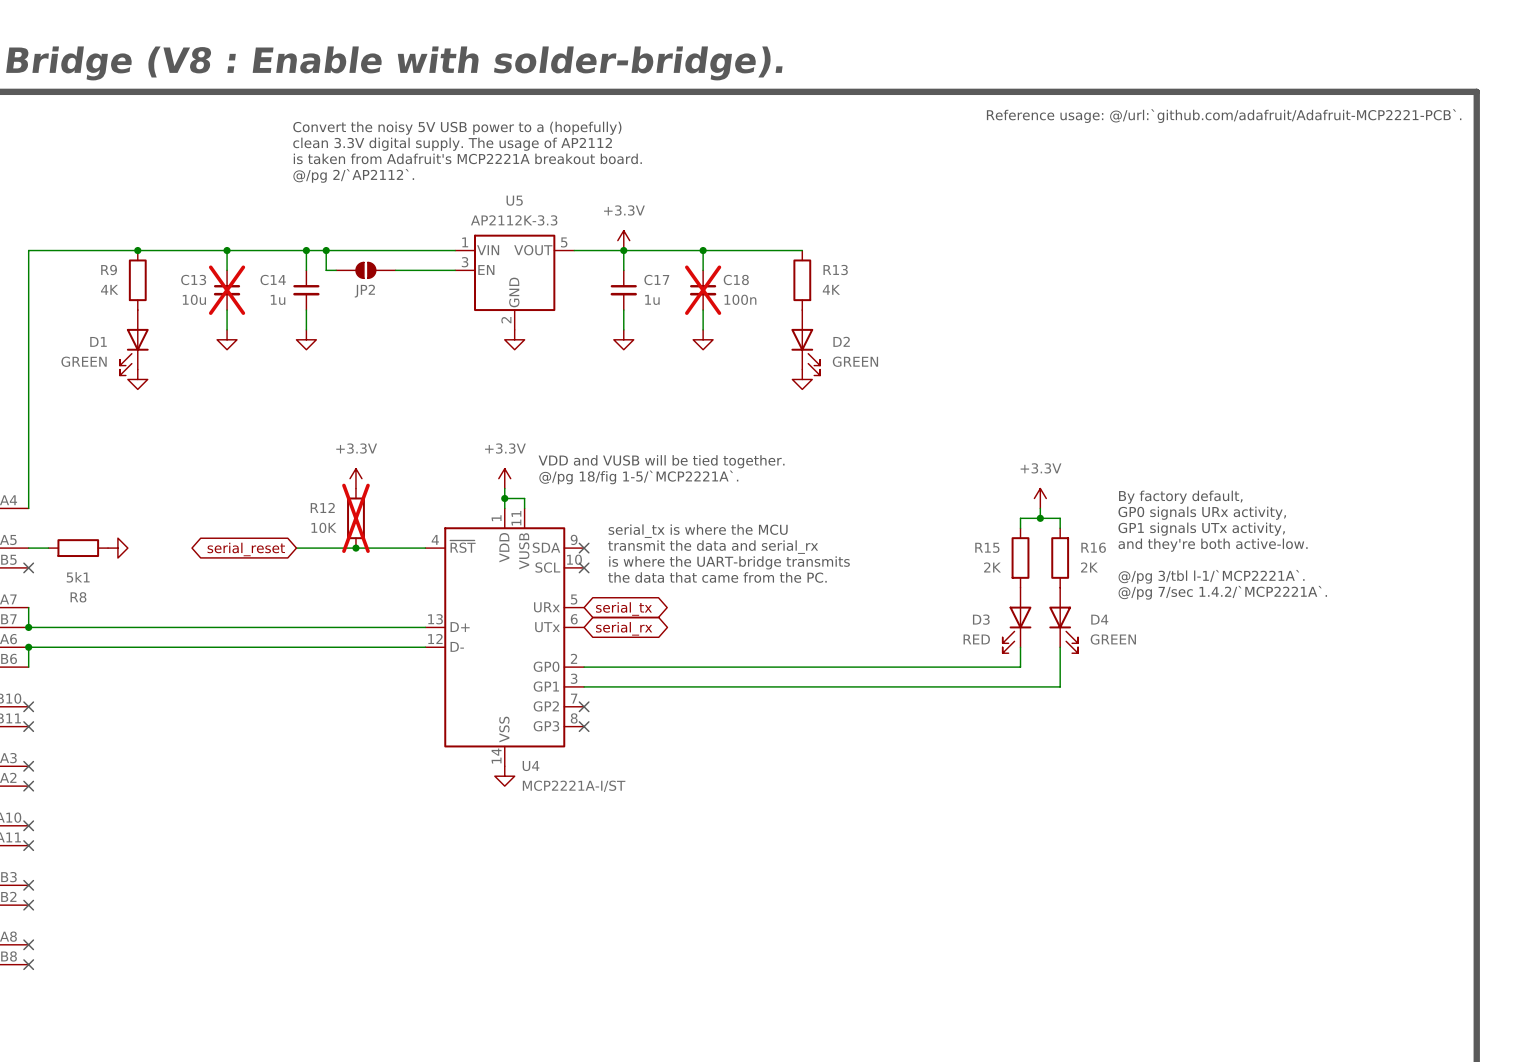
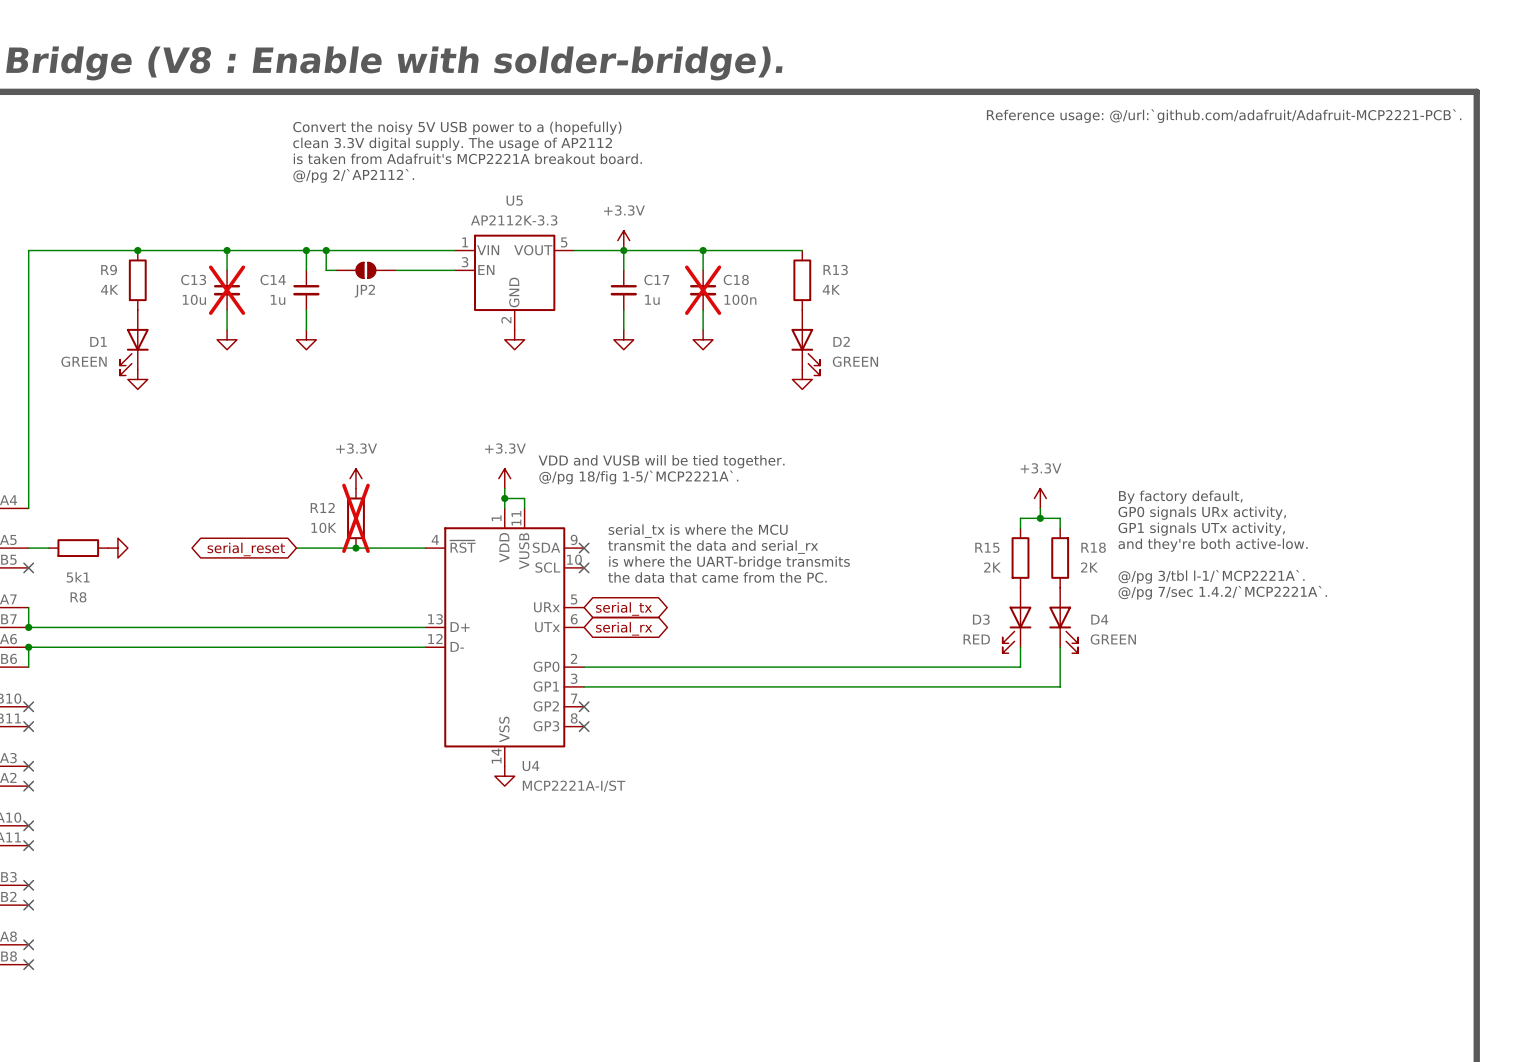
R16 name: R16 (1093, 547) -> R18 (1093, 547)

